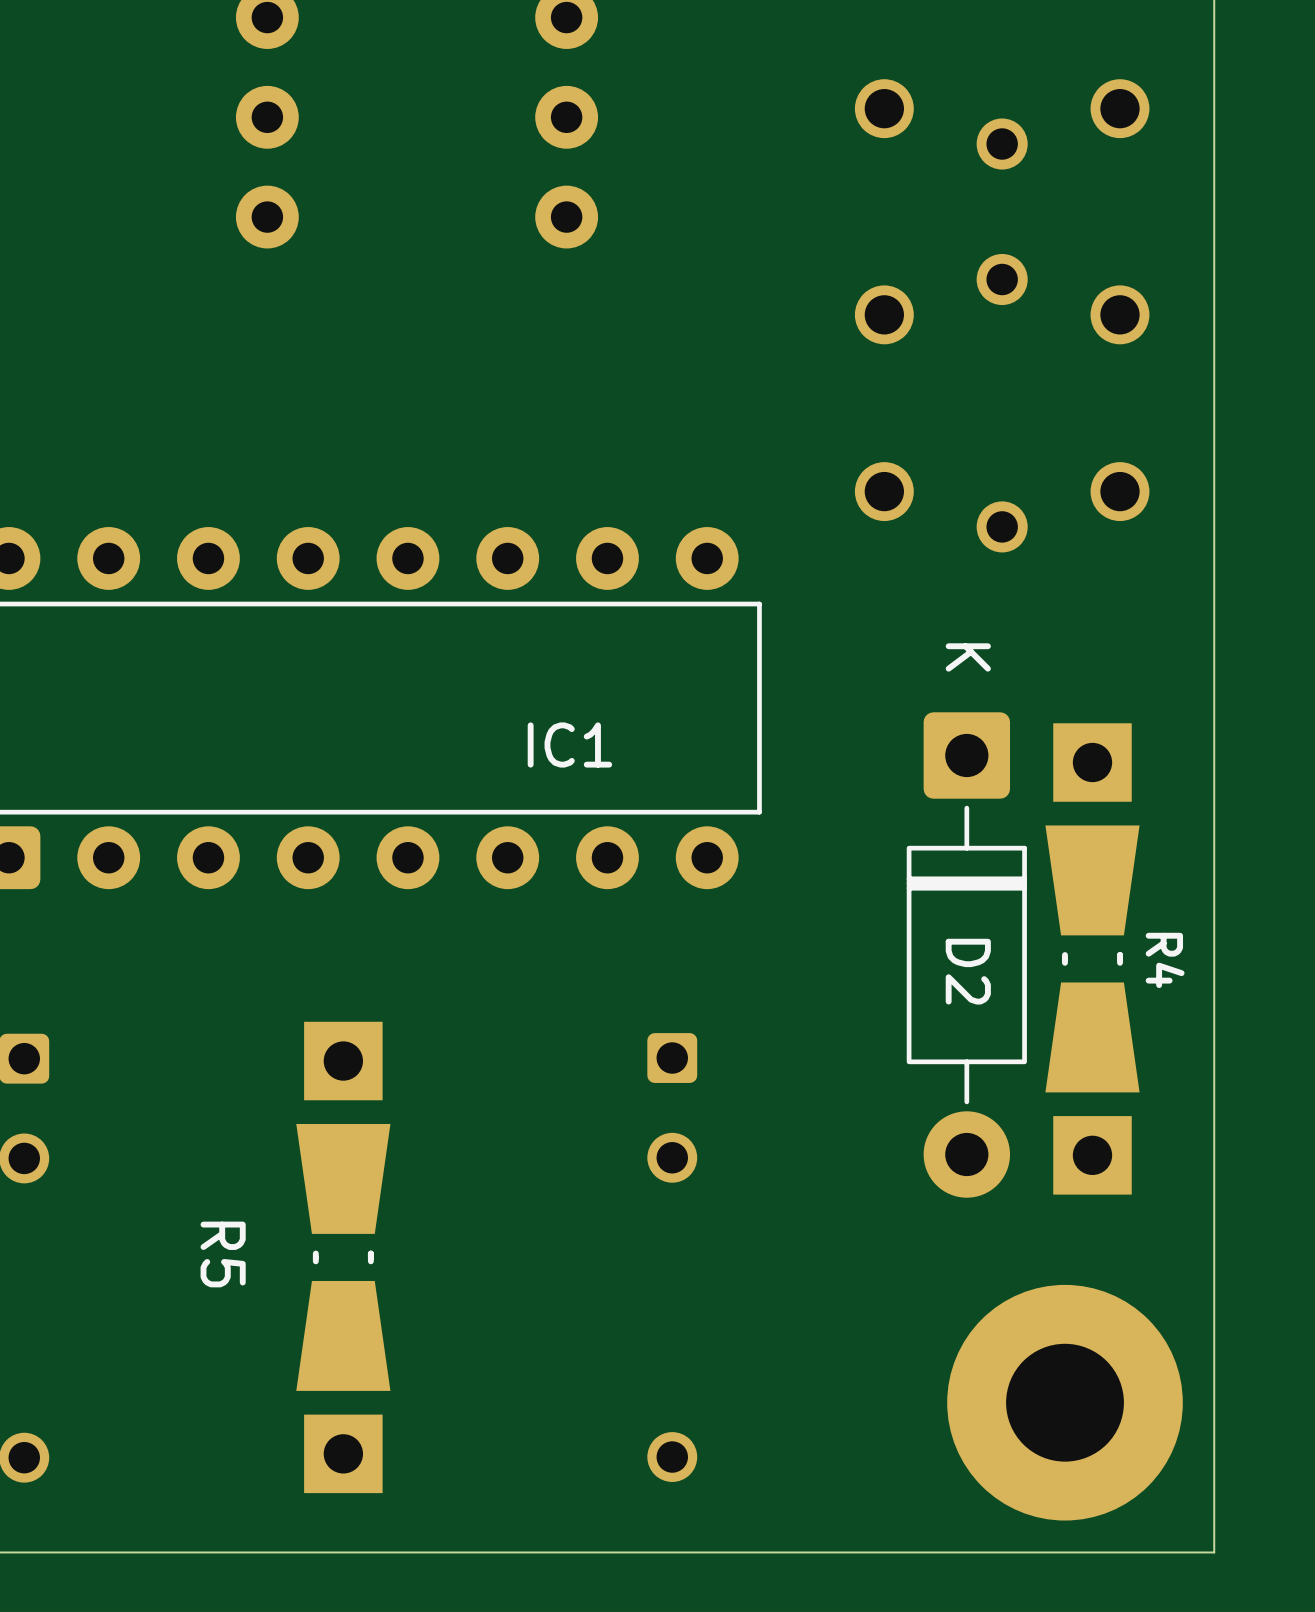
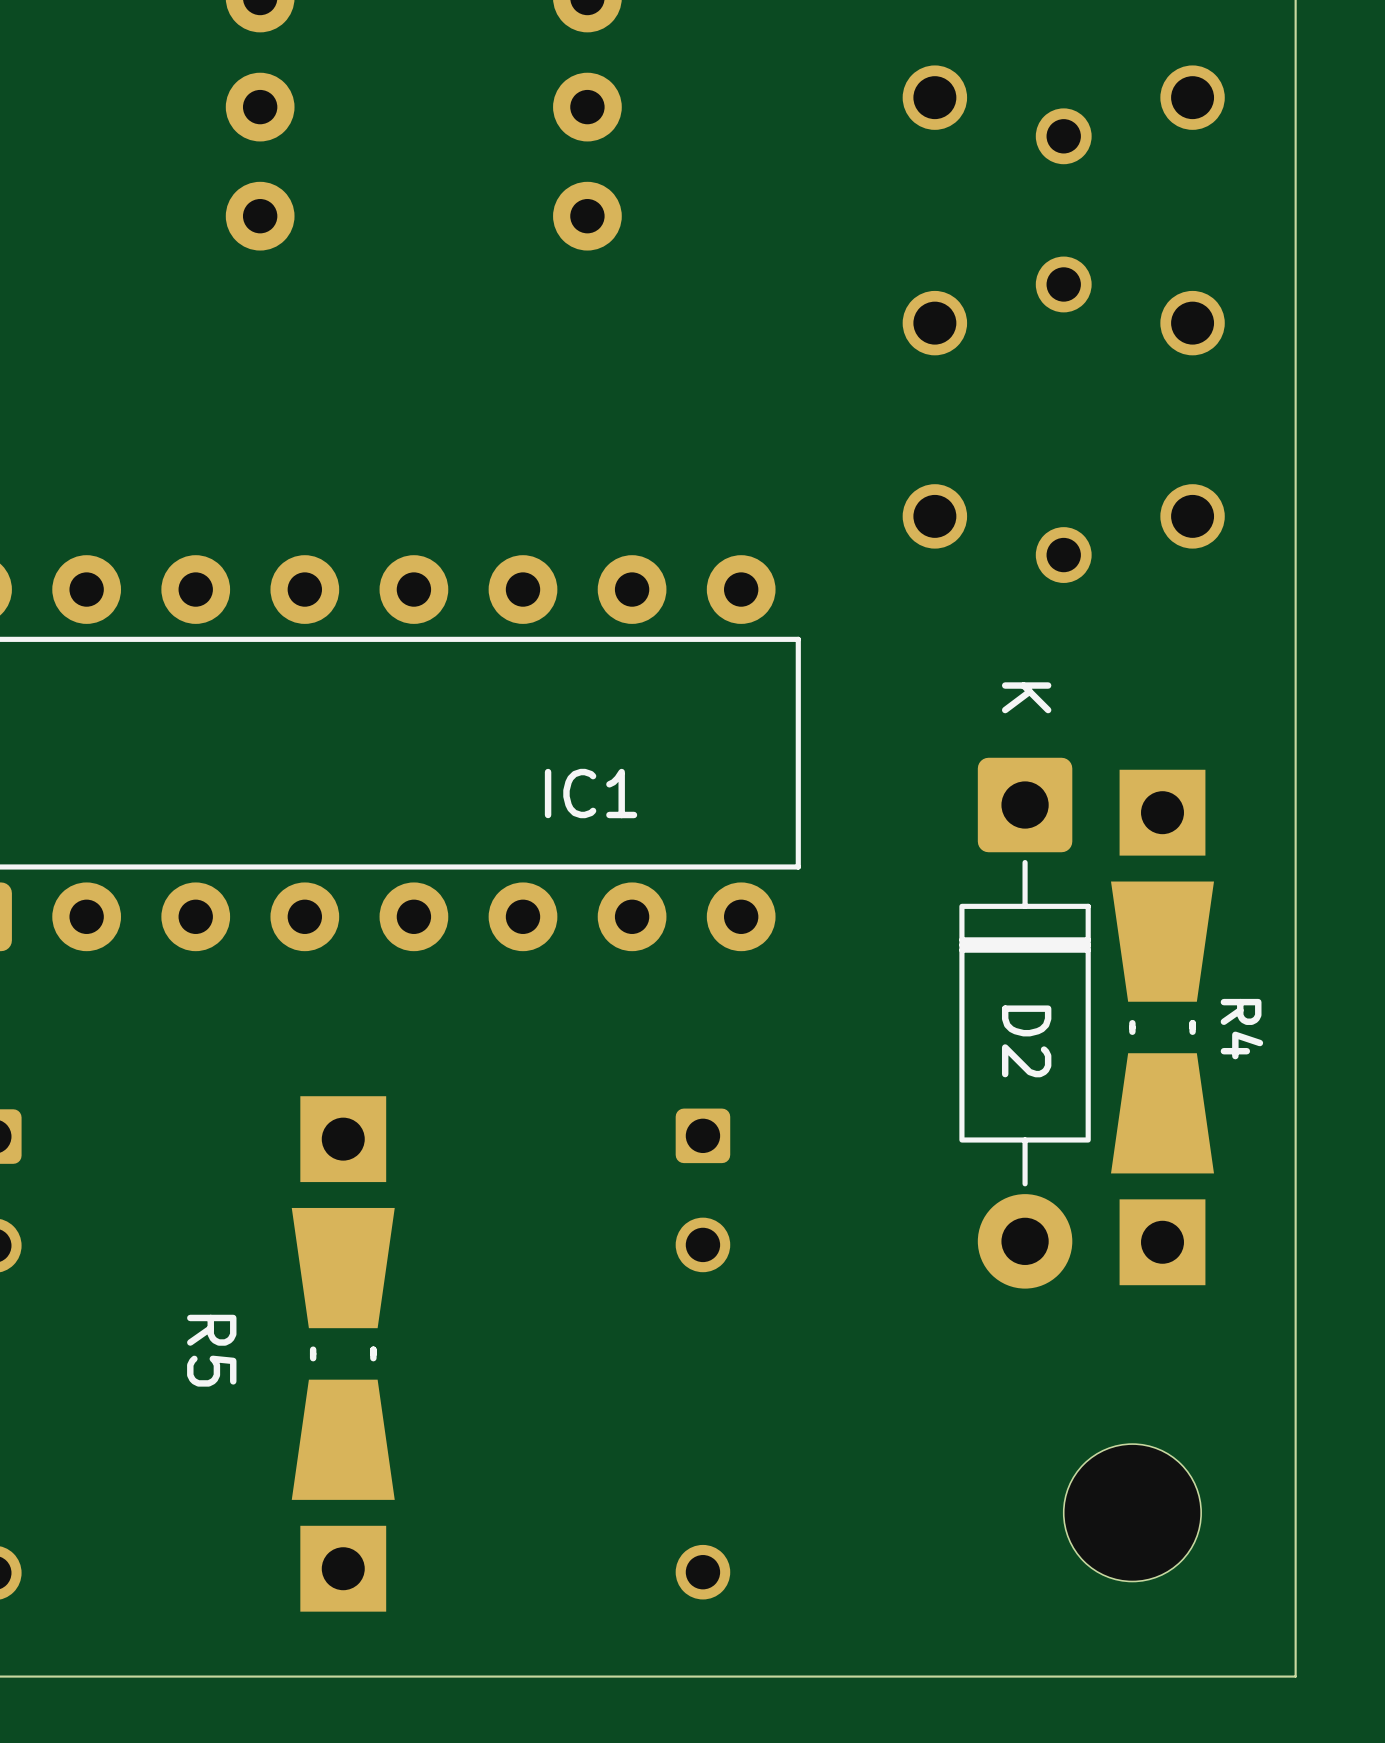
part footprint: [947, 1284, 1183, 1521] -> [1063, 1444, 1202, 1582]

